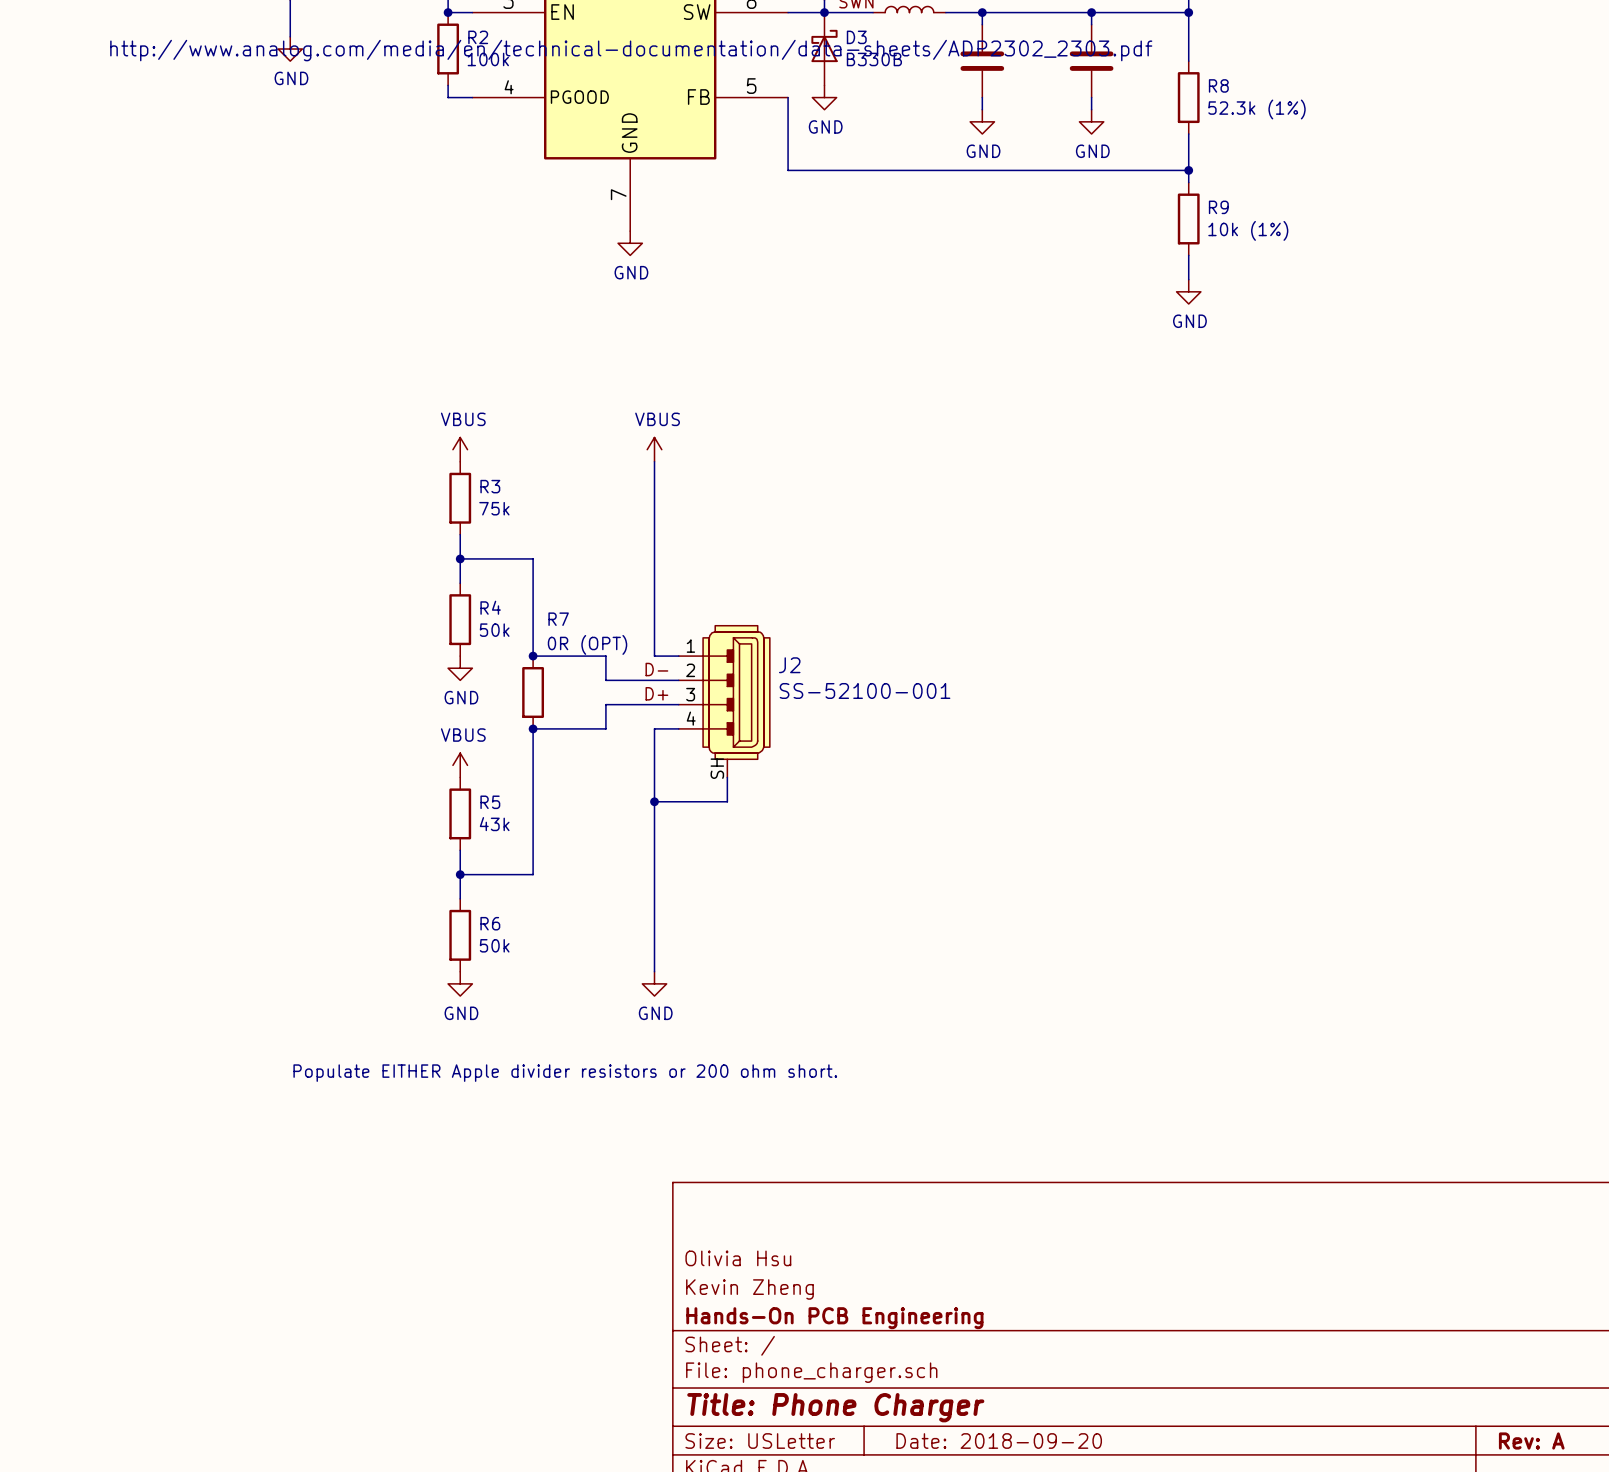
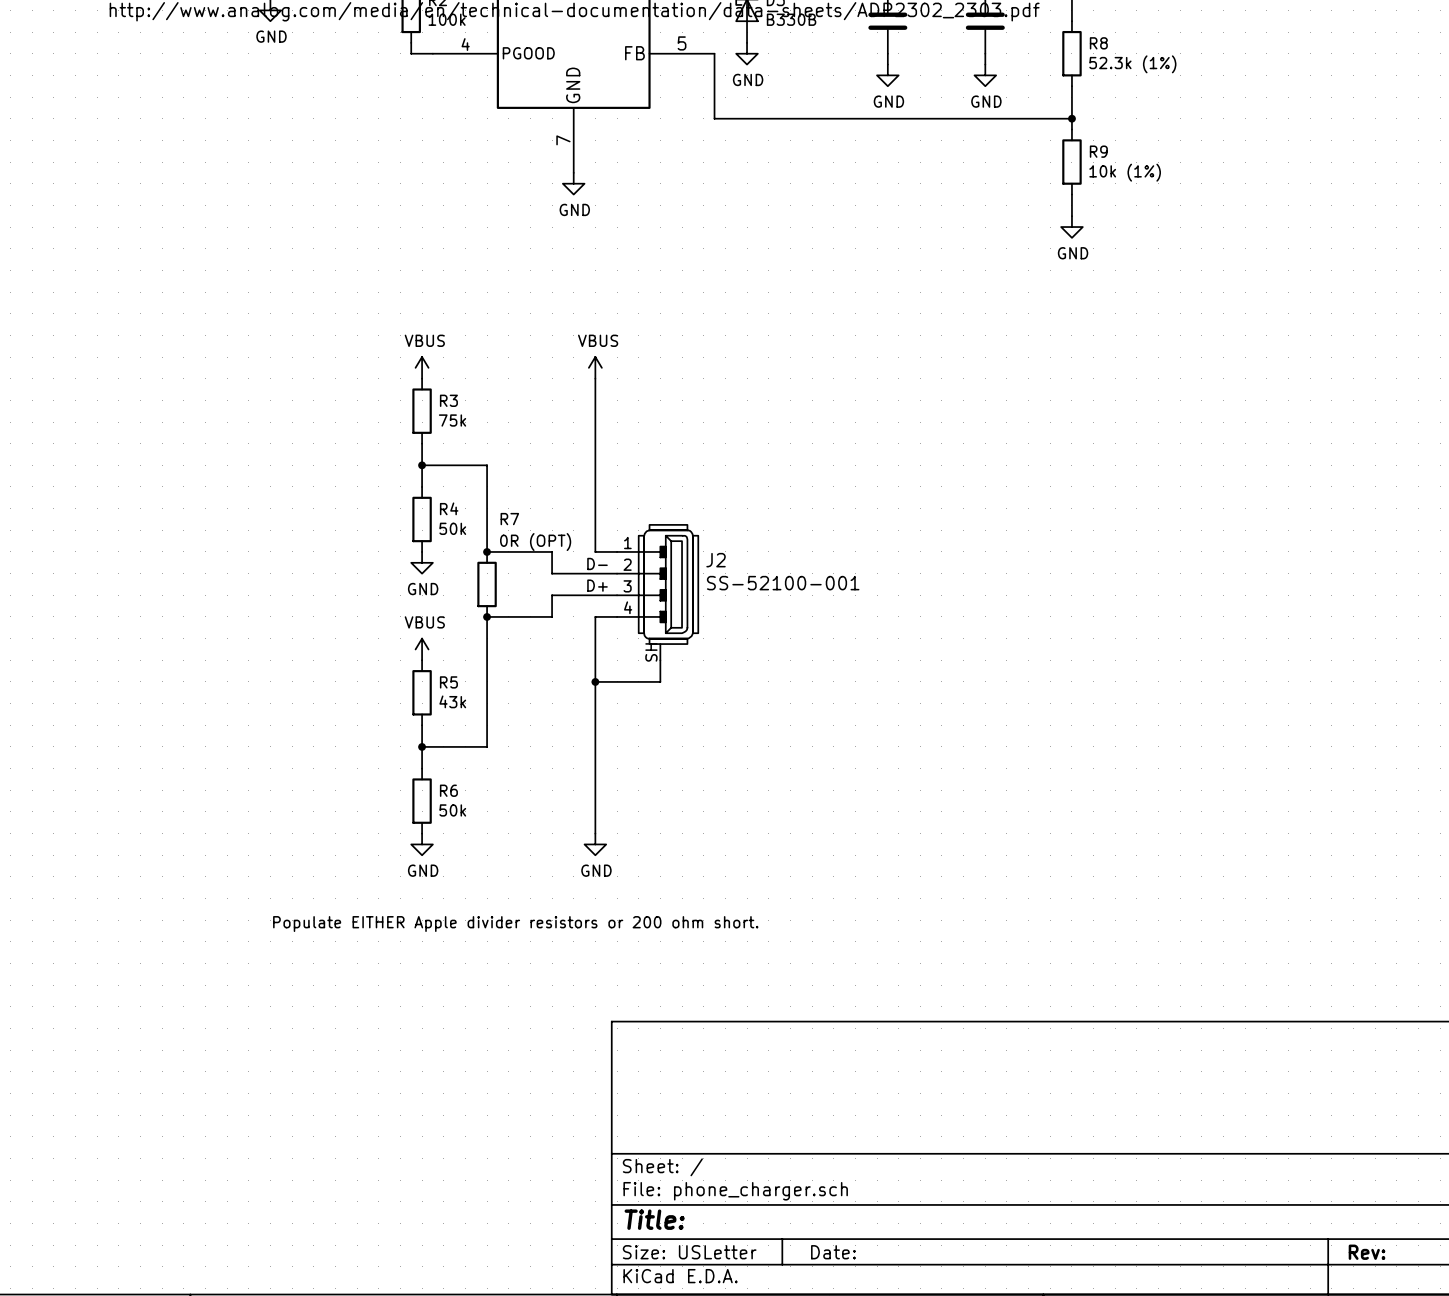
title block: Olivia Hsu (738, 1258) -> none
title block: Kevin Zheng (749, 1289) -> none
title block: Hands-On PCB Engineering (834, 1318) -> none
title block: Title: Phone Charger (835, 1407) -> Title: (654, 1219)
title block: Date: 2018-09-20 (999, 1441) -> Date: (833, 1252)
title block: Rev: A (1531, 1441) -> Rev: (1367, 1252)

